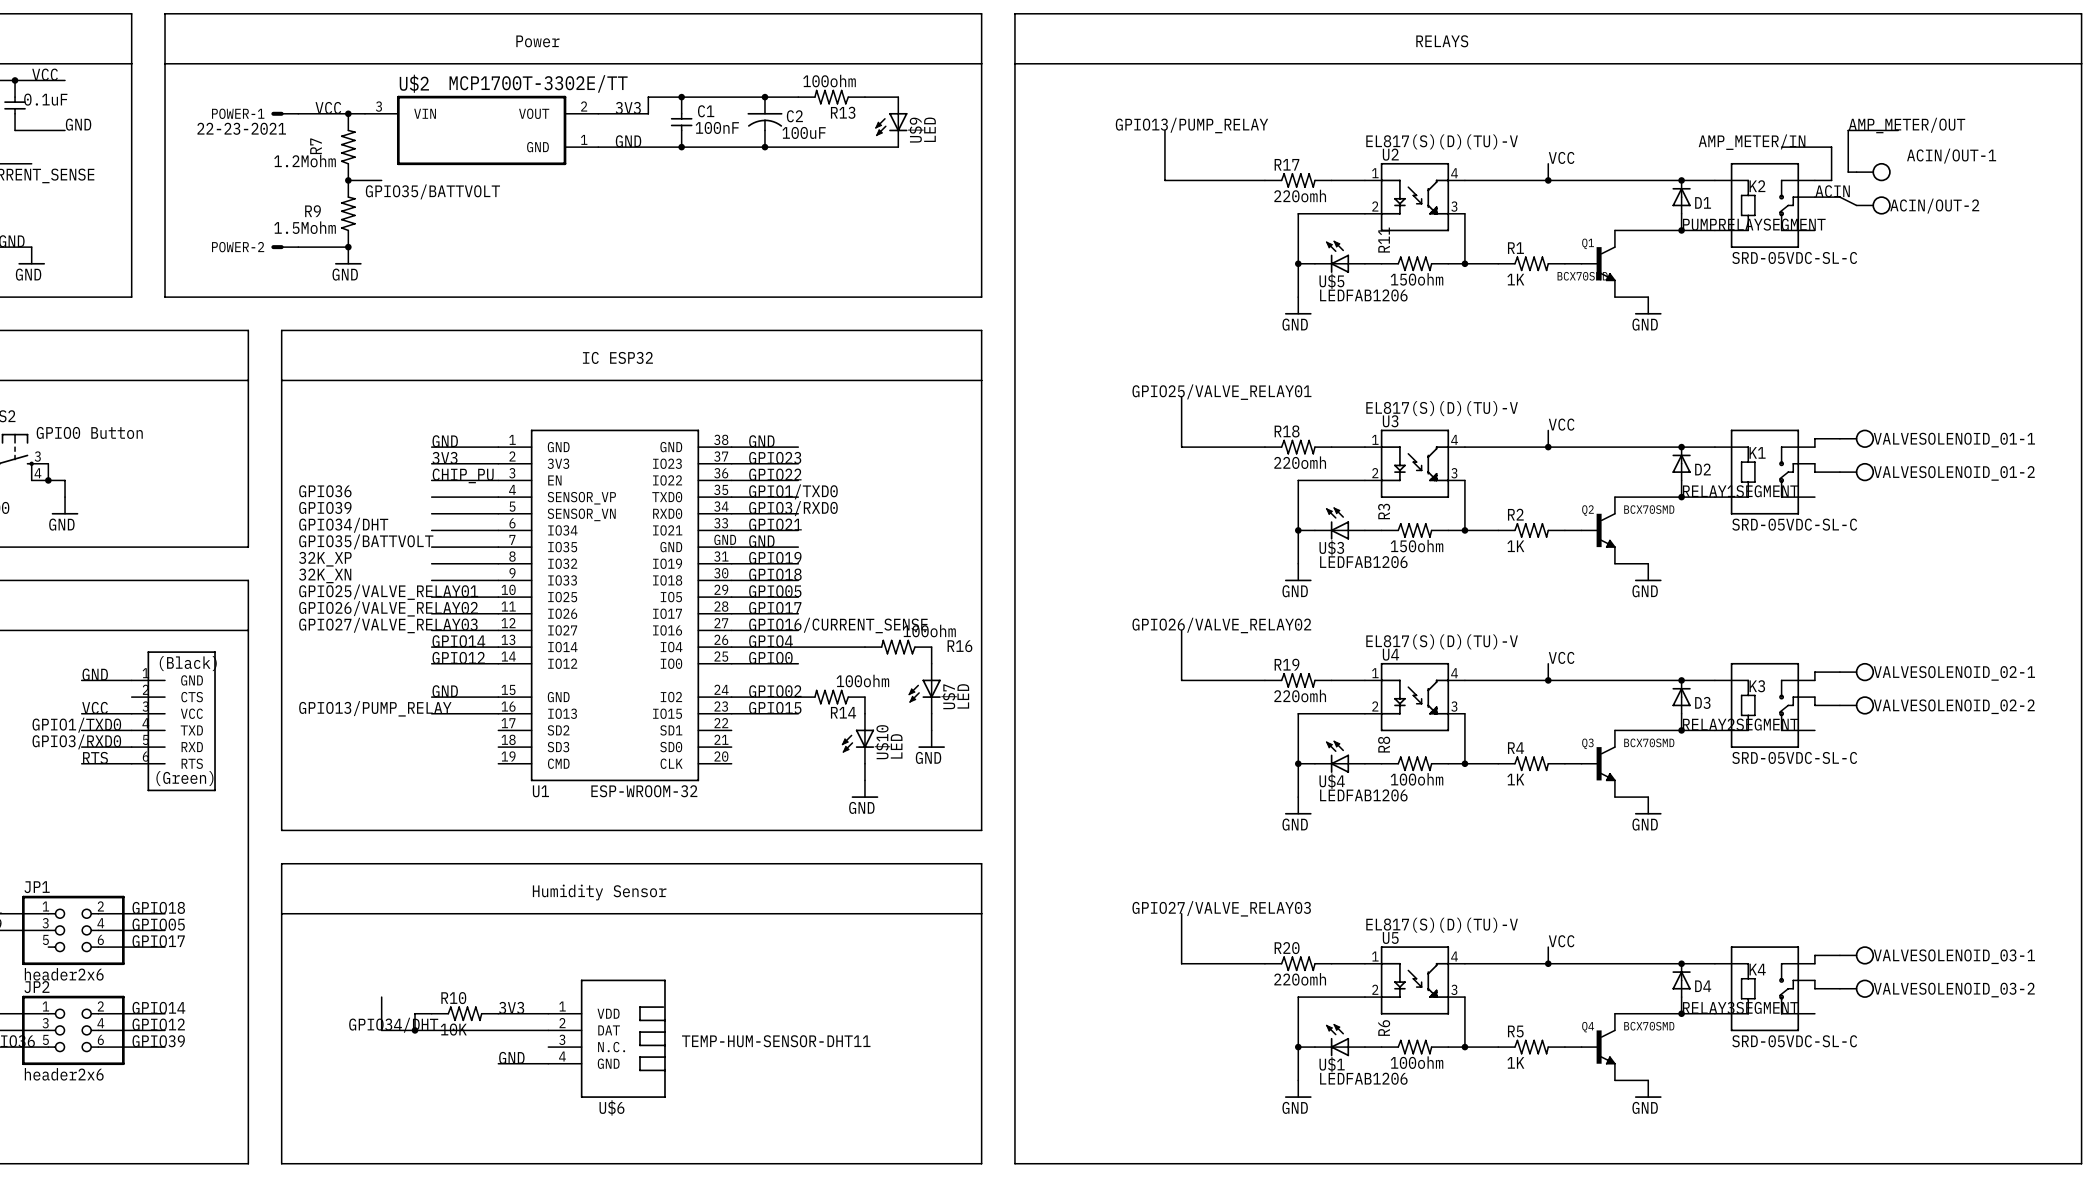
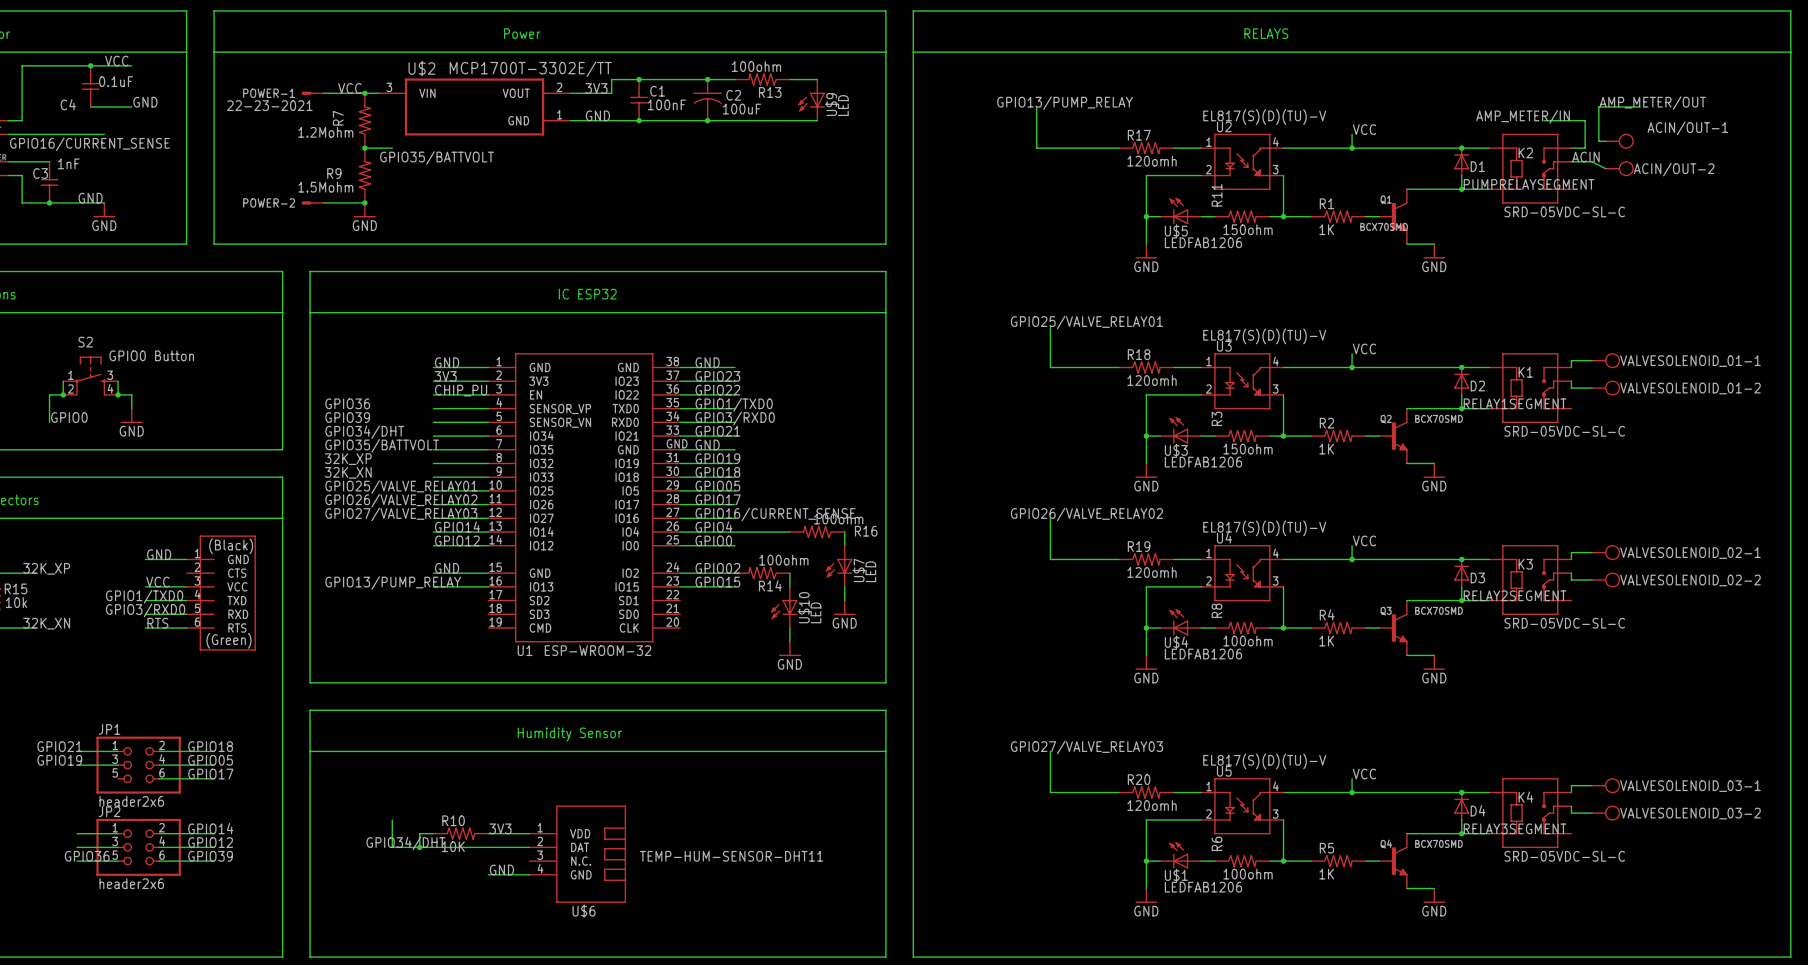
R17 value: 220omh (1300, 196) -> 120omh (1152, 161)
R18 value: 220omh (1300, 462) -> 120omh (1152, 380)
R19 value: 220omh (1300, 696) -> 120omh (1152, 572)
R20 value: 220omh (1300, 979) -> 120omh (1152, 805)

